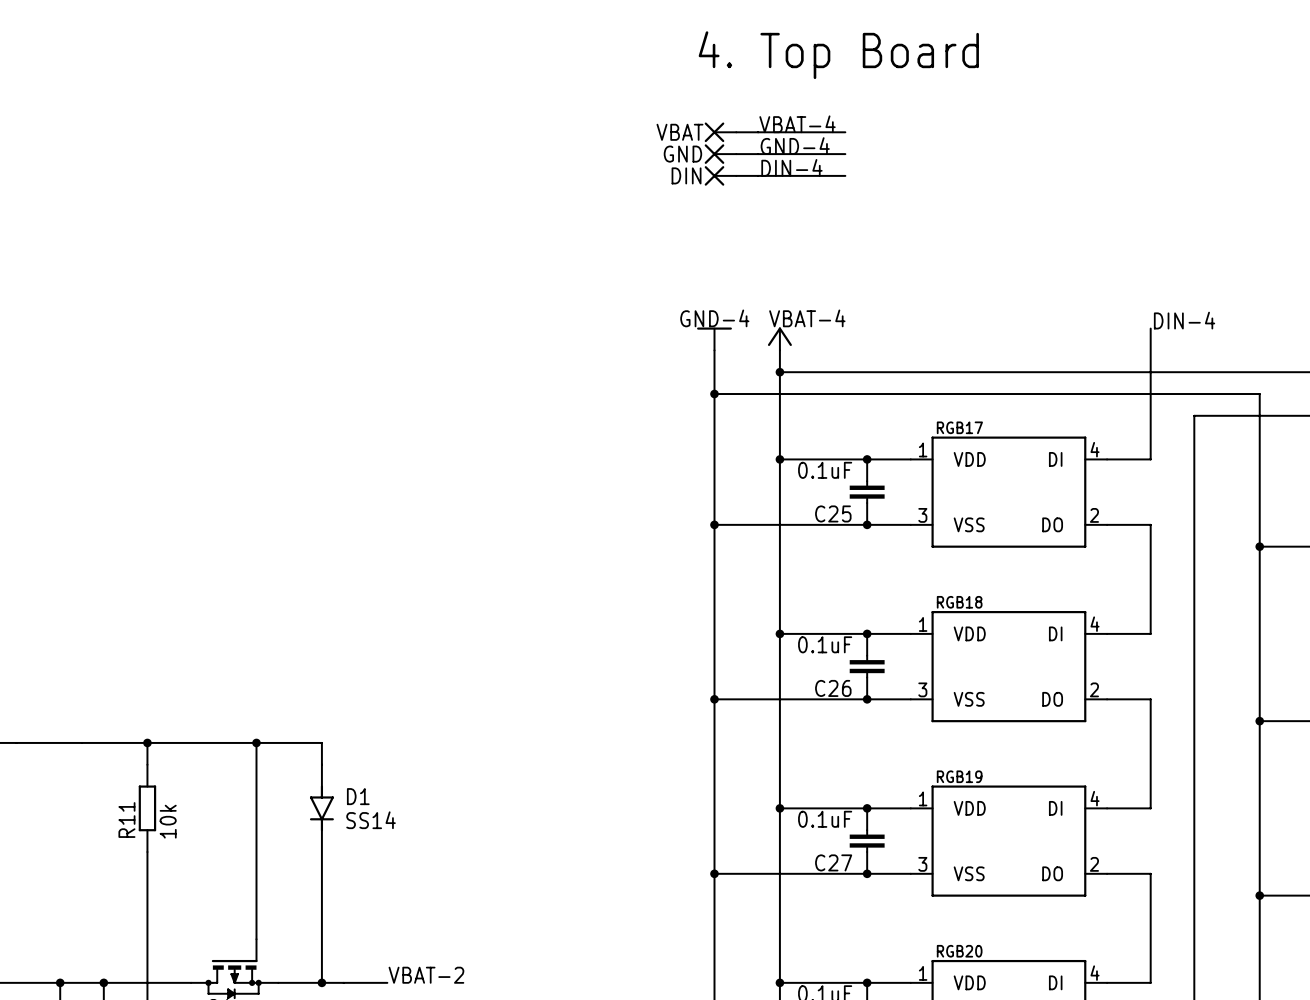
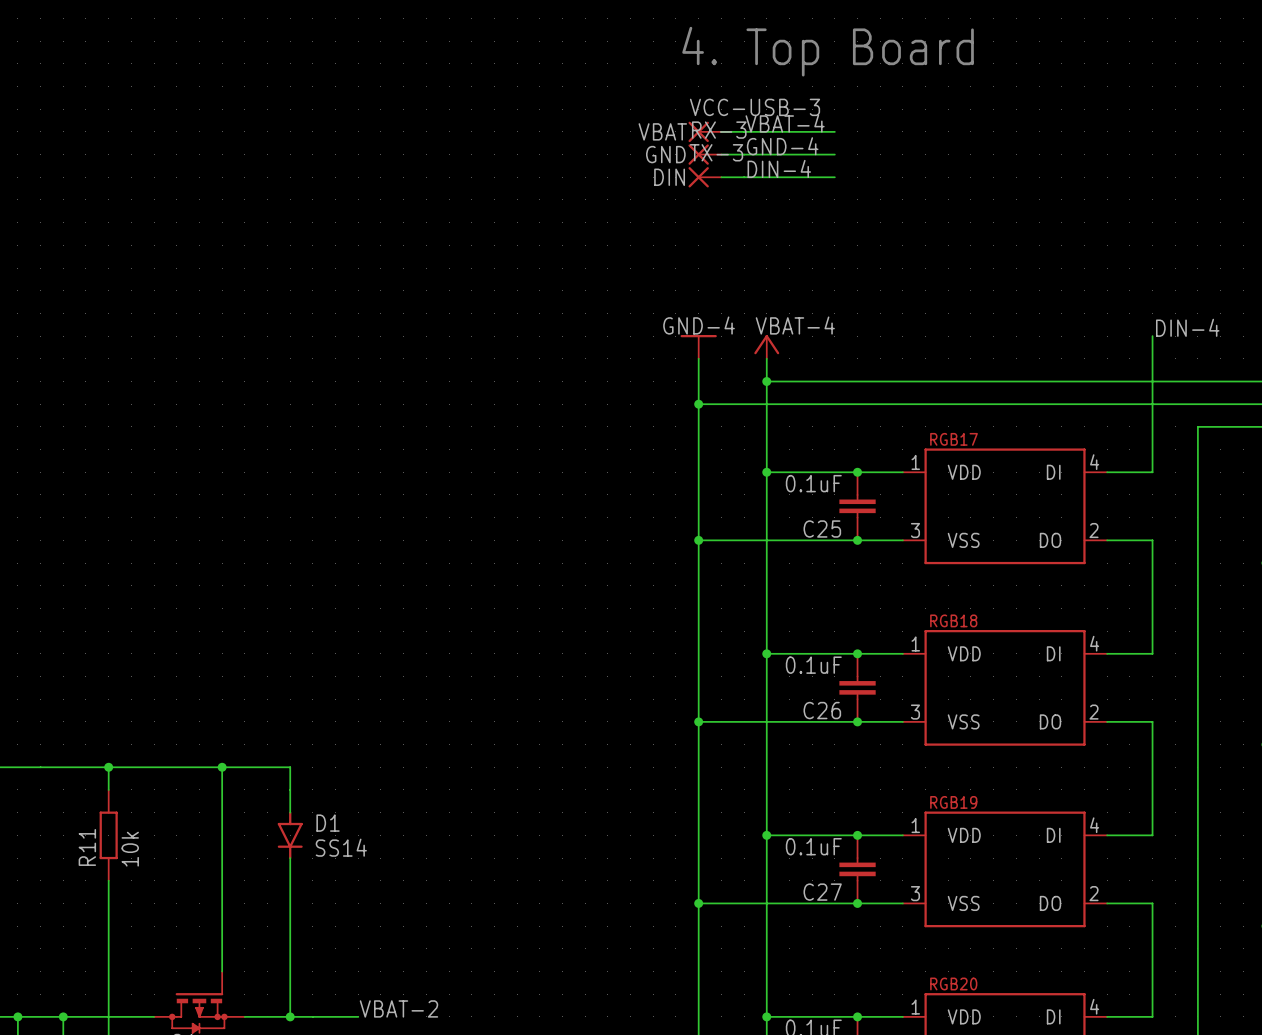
VCC-USB-3 name: none -> VCC-USB-3 (755, 107)
RX-3 name: none -> RX-3 (719, 130)
TX-3 name: none -> TX-3 (716, 152)

